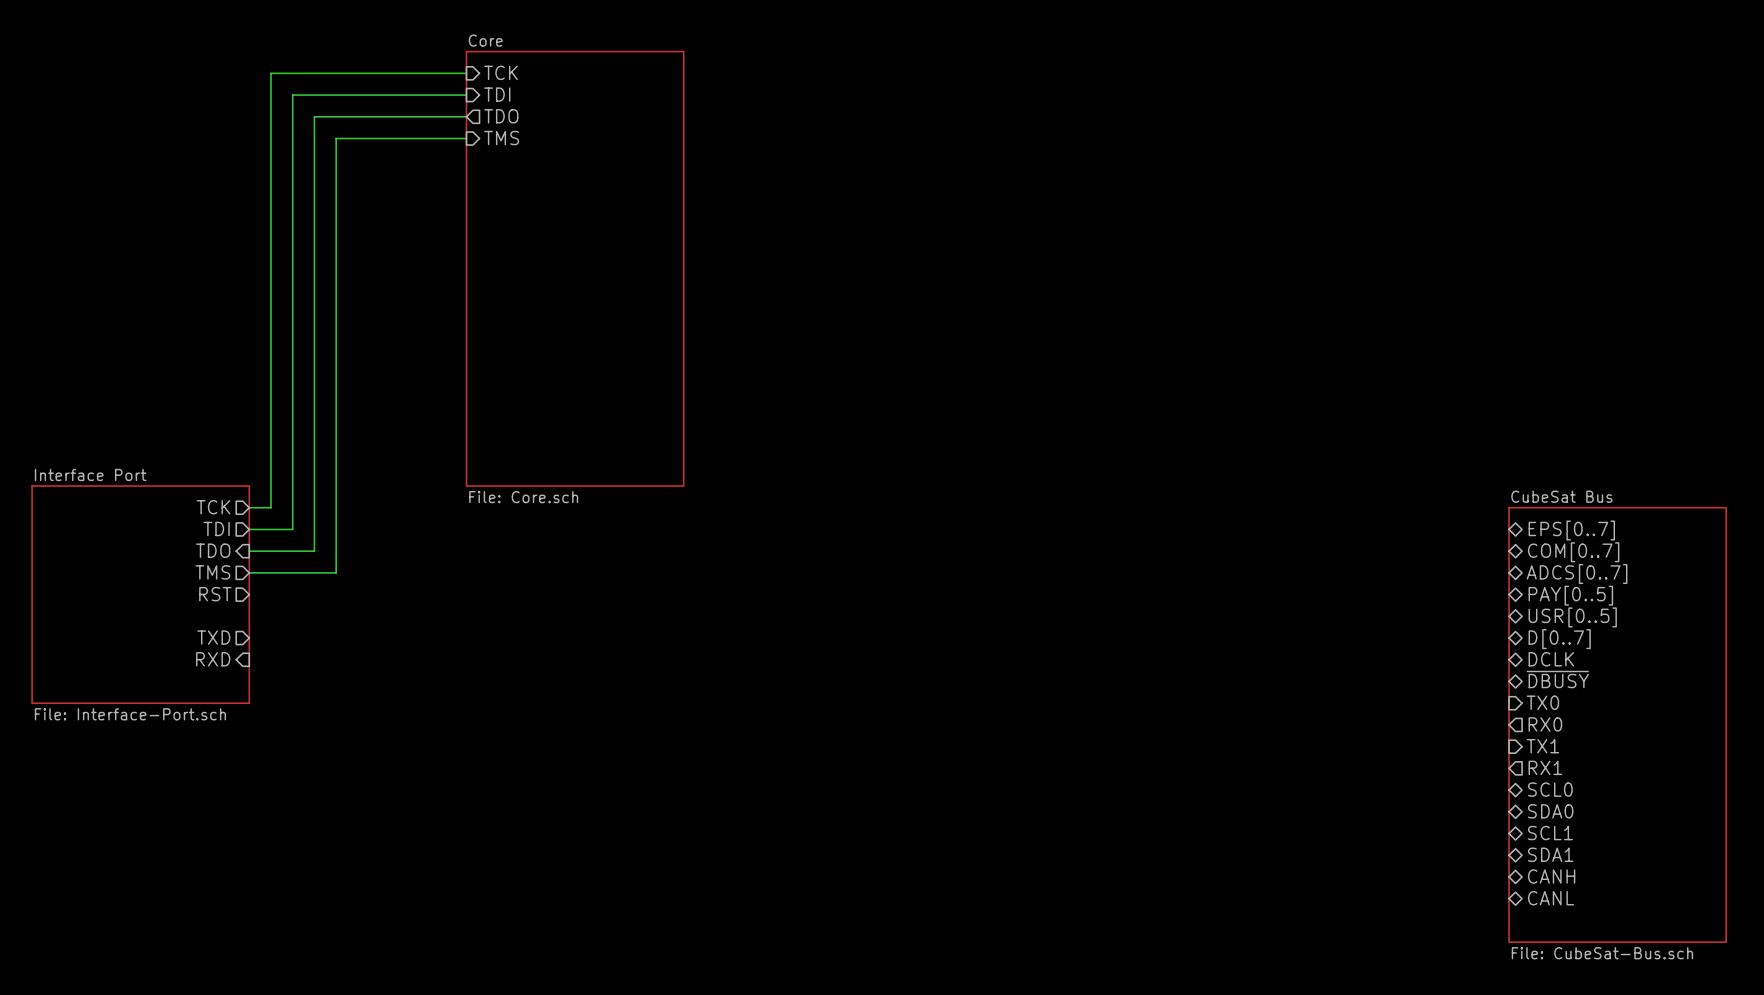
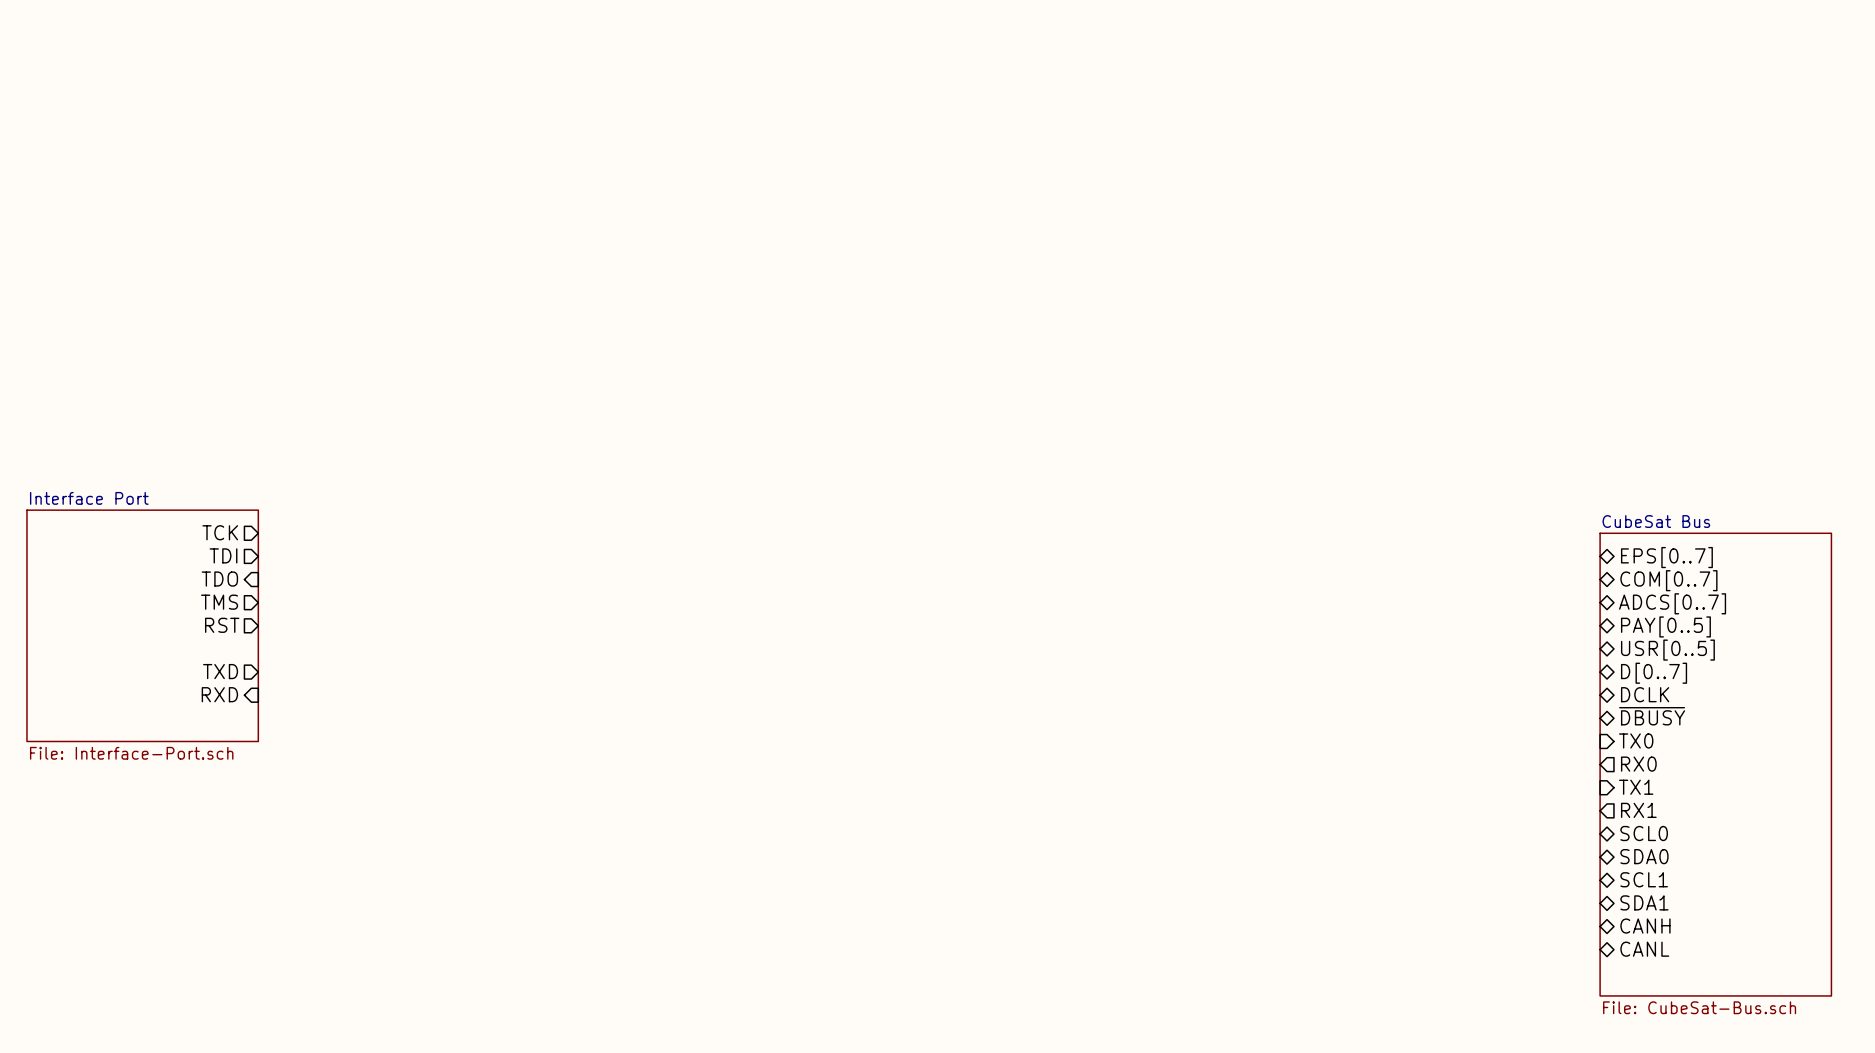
sheet pin: TCK (501, 72) -> none
wire: (466, 73) (271, 73) (271, 507) (249, 507) -> none
sheet pin: TDI (497, 94) -> none
wire: (466, 95) (292, 95) (292, 529) (249, 529) -> none
wire: (466, 116) (314, 116) (314, 551) (249, 551) -> none
sheet pin: TDO (501, 116) -> none
wire: (466, 138) (336, 138) (336, 572) (249, 572) -> none
sheet pin: TMS (501, 138) -> none
sheet Core: File: Core.sch (575, 268) -> none

